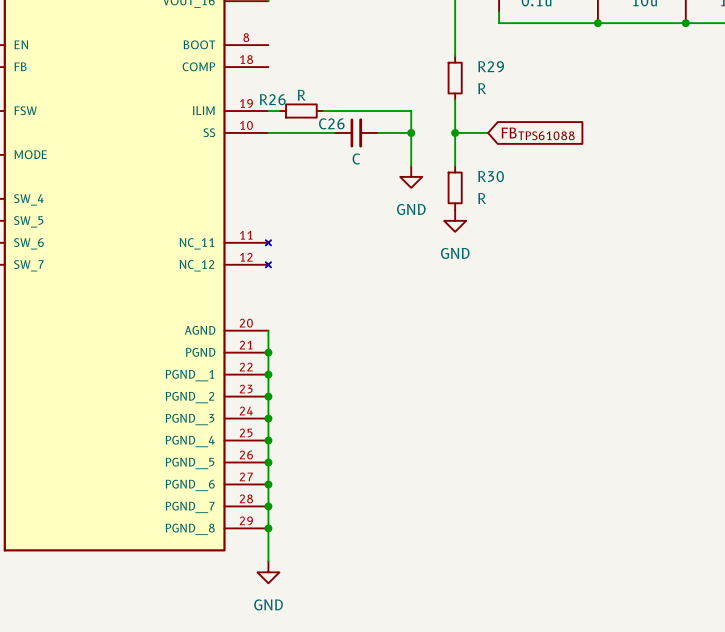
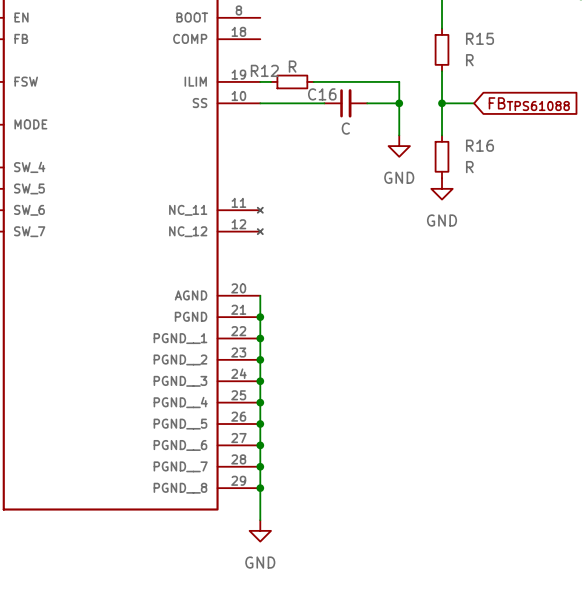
R29 name: R29 (491, 66) -> R15 (480, 38)
R26 name: R26 (272, 99) -> R12 (264, 70)
C26 name: C26 (331, 123) -> C16 (322, 94)
R30 name: R30 (491, 176) -> R16 (480, 145)

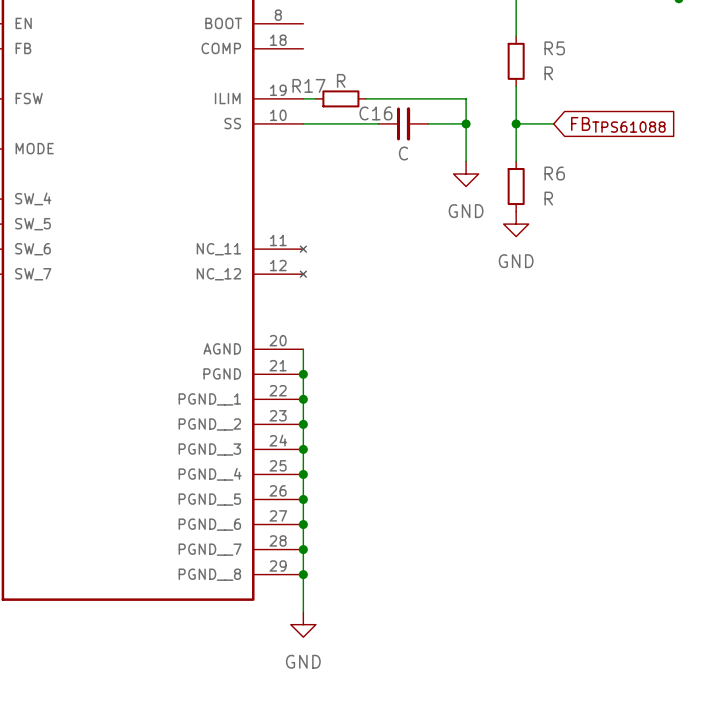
R15 name: R15 (480, 38) -> R5 (554, 48)
R12 name: R12 (264, 70) -> R17 (308, 85)
R16 name: R16 (480, 145) -> R6 (554, 173)

